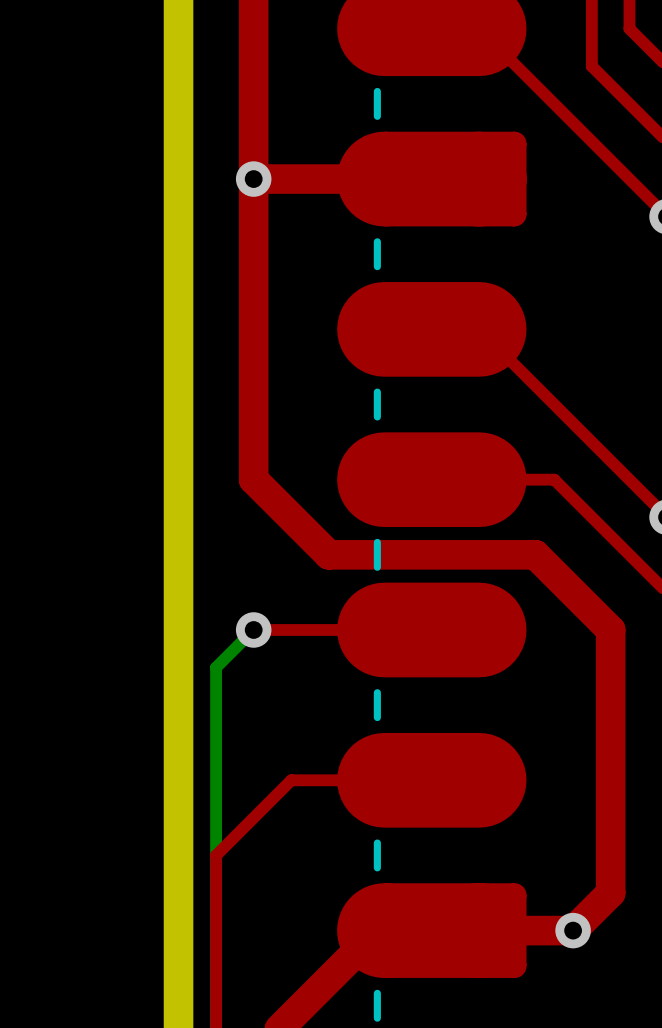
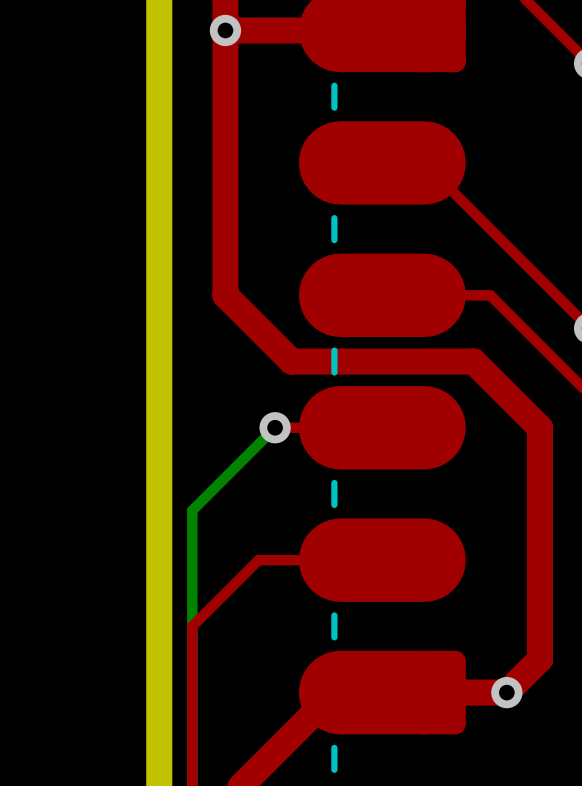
top track: (253, 629) (310, 629) -> none
bottom track: (253, 629) (216, 667) (216, 723) -> (275, 427) (192, 510)
via position: (253, 629) -> (275, 427)

